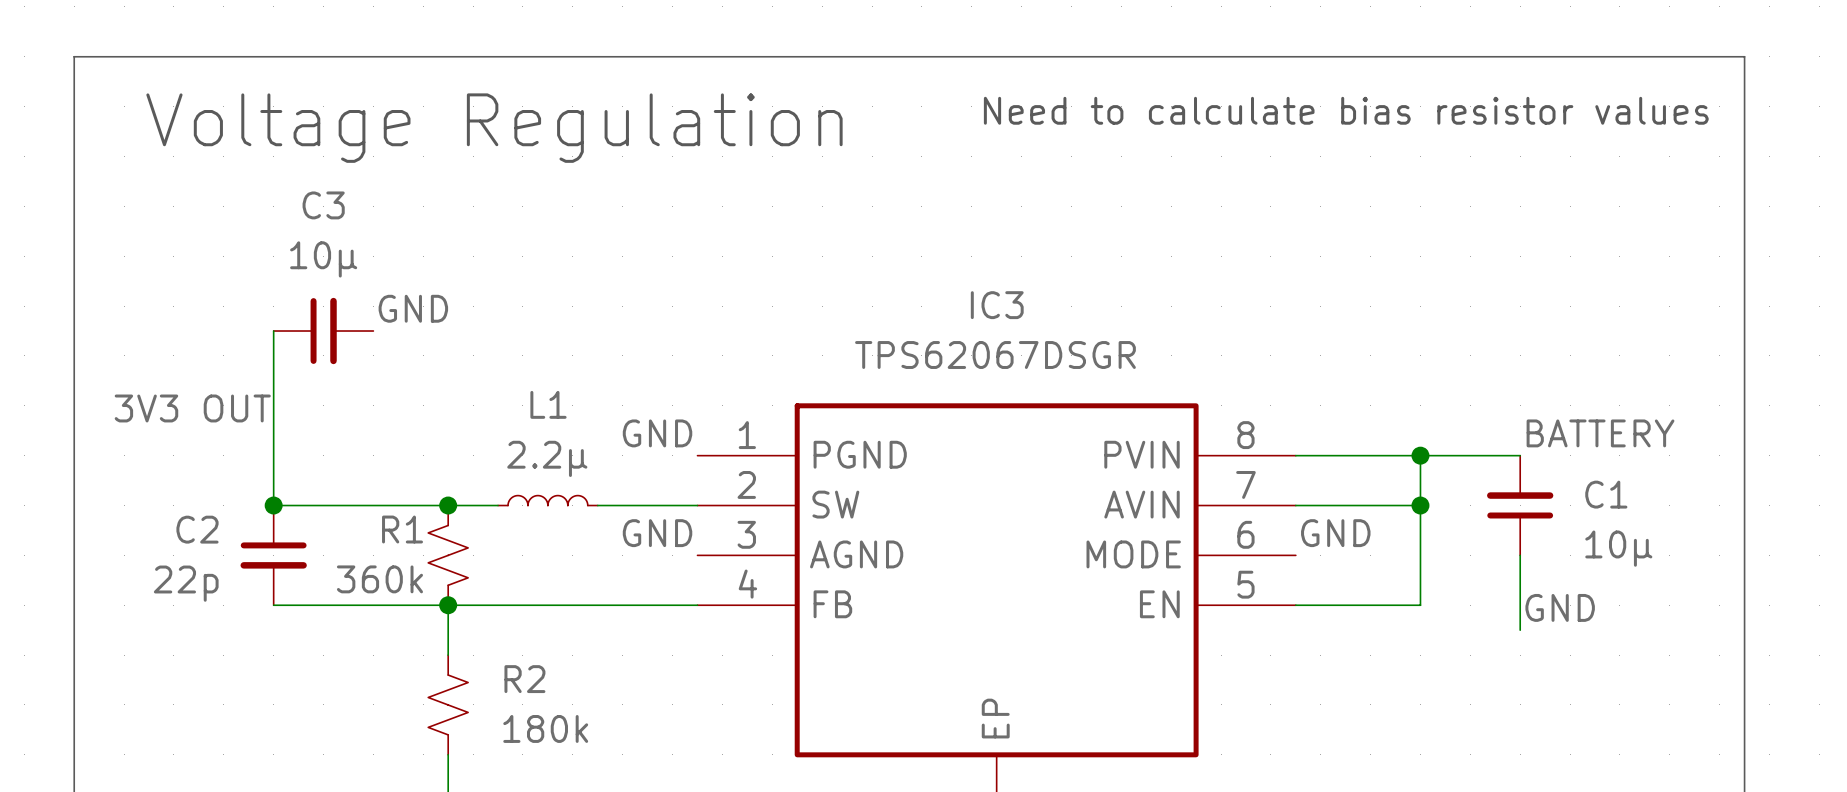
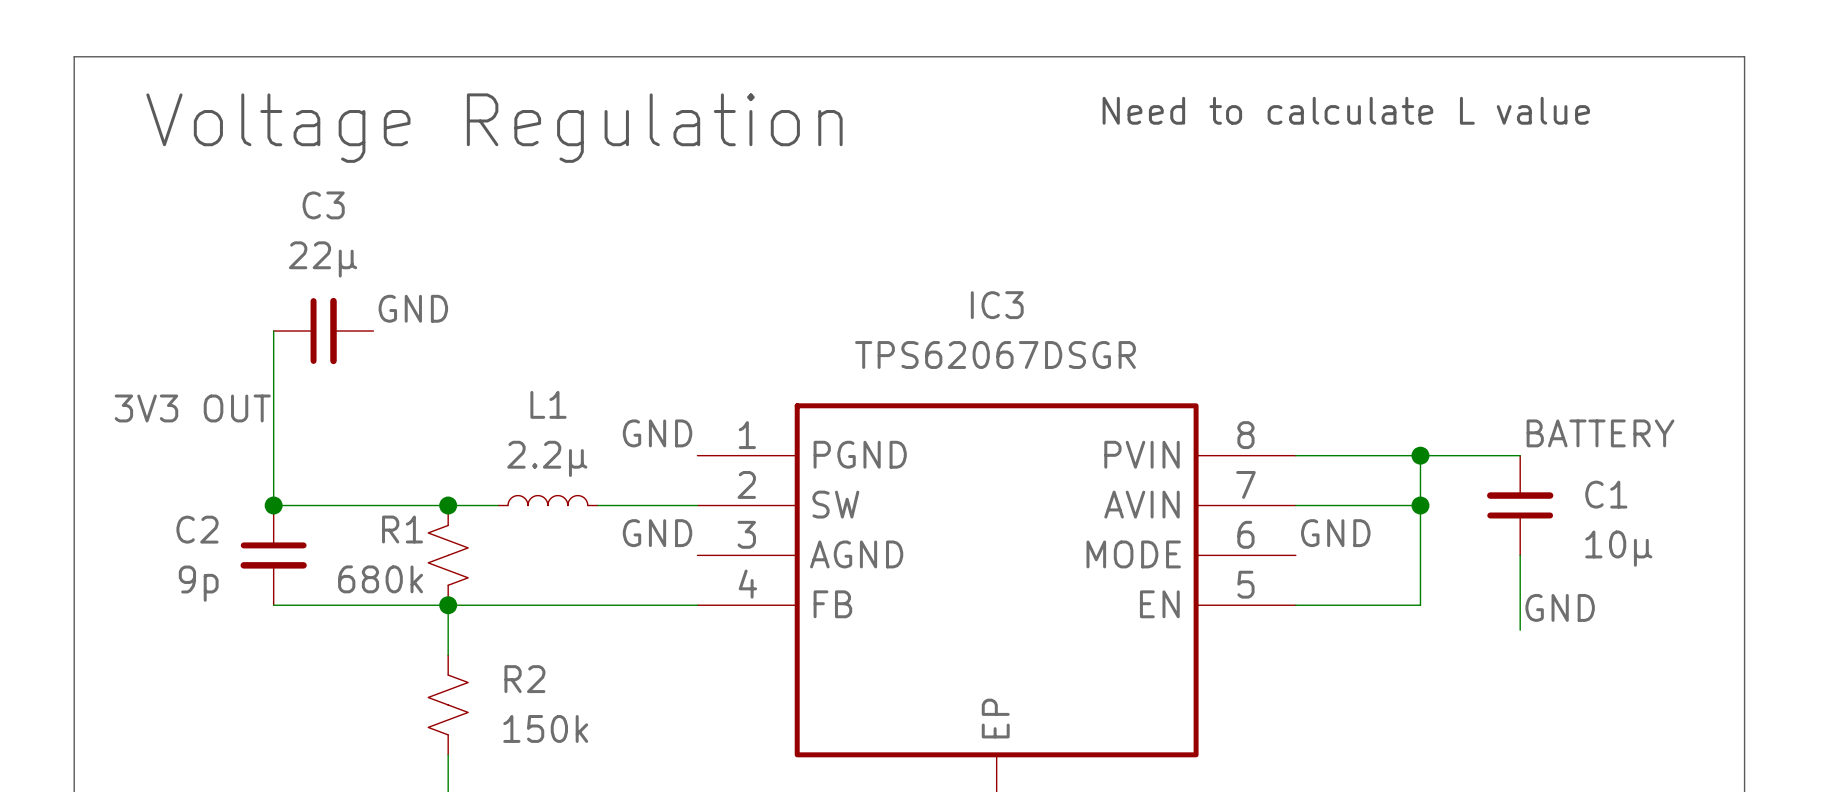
text: Need to calculate bias resistor values (1346, 110) -> Need to calculate L value (1346, 110)
C3 value: 10µ (323, 259) -> 22µ (323, 259)
R1 value: 360k (379, 579) -> 680k (380, 579)
C2 value: 22p (186, 583) -> 9p (198, 583)
R2 value: 180k (545, 728) -> 150k (545, 728)

